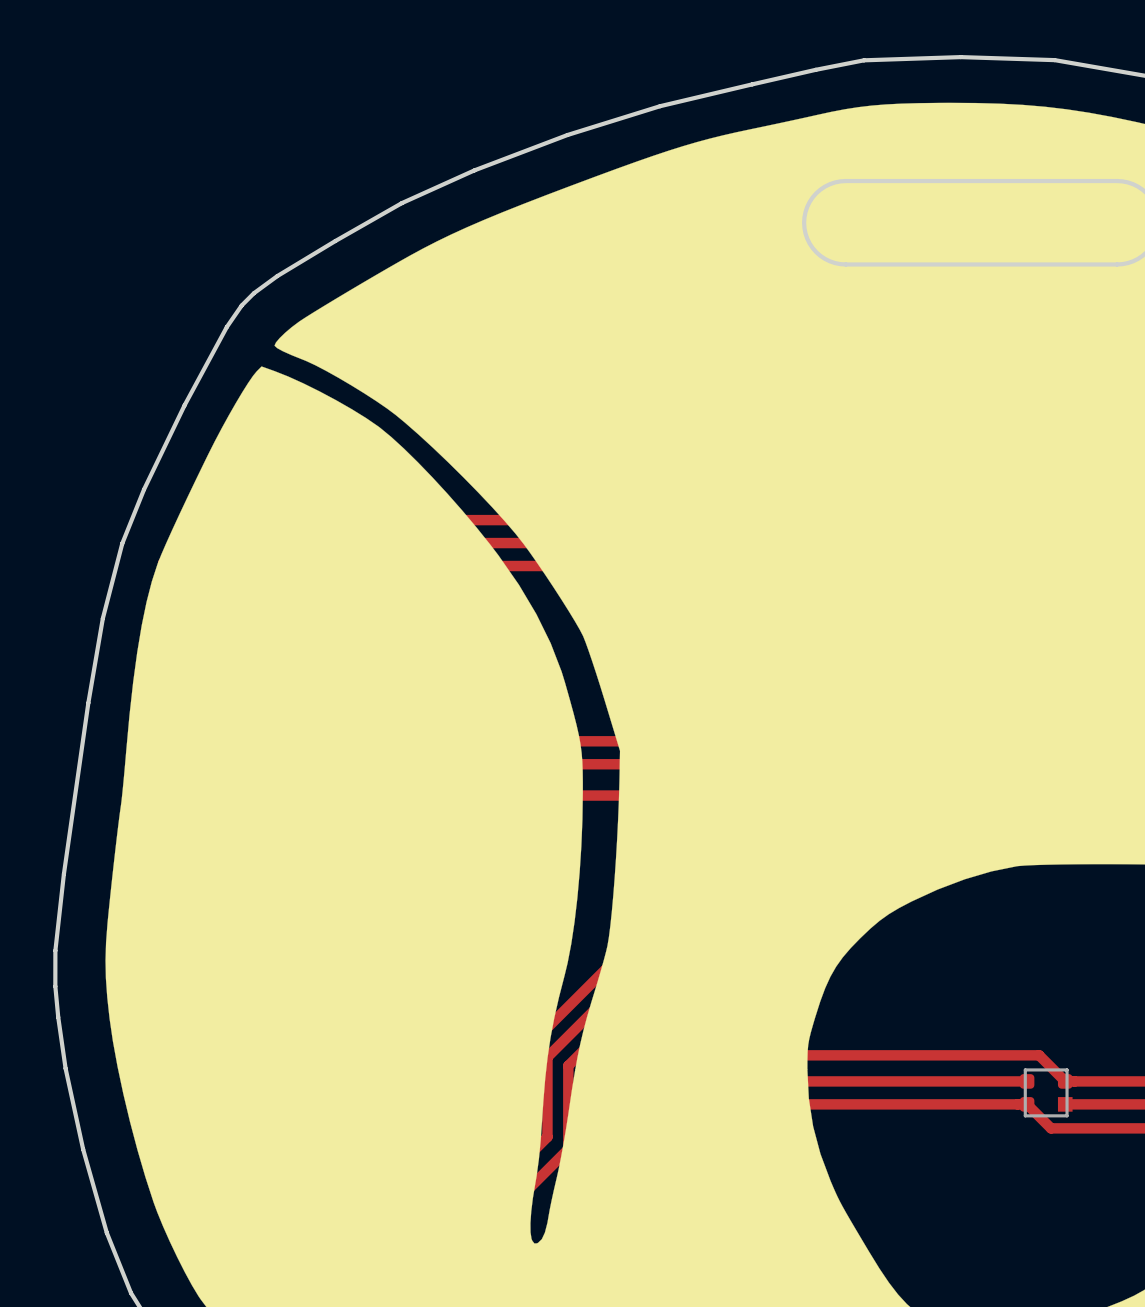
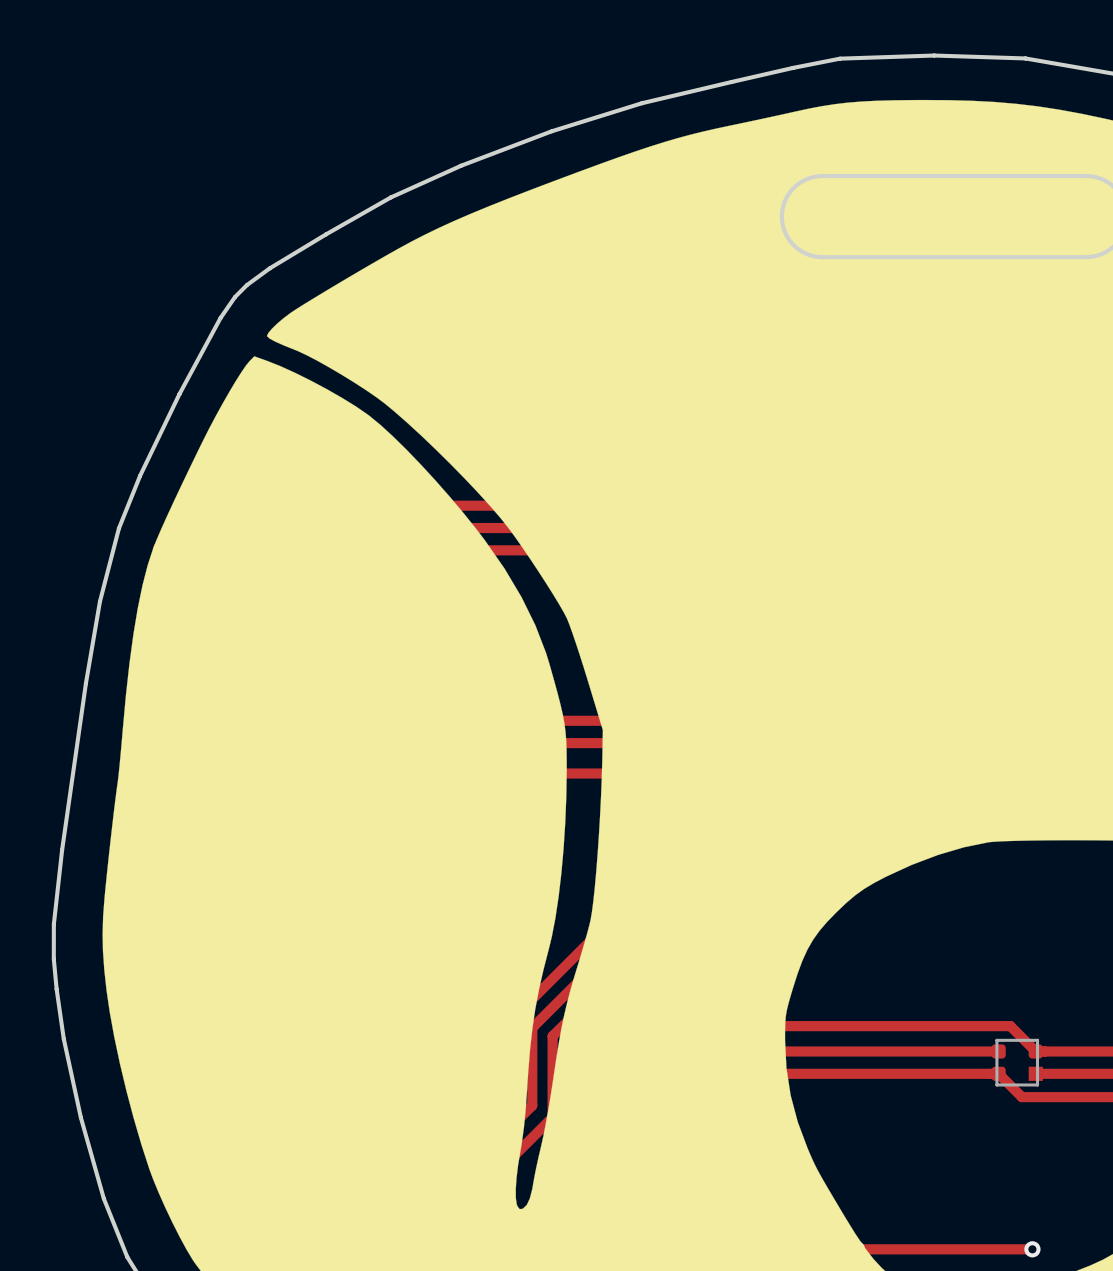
track: none -> (856, 1249) (1032, 1249)
via: none -> (1032, 1249)

